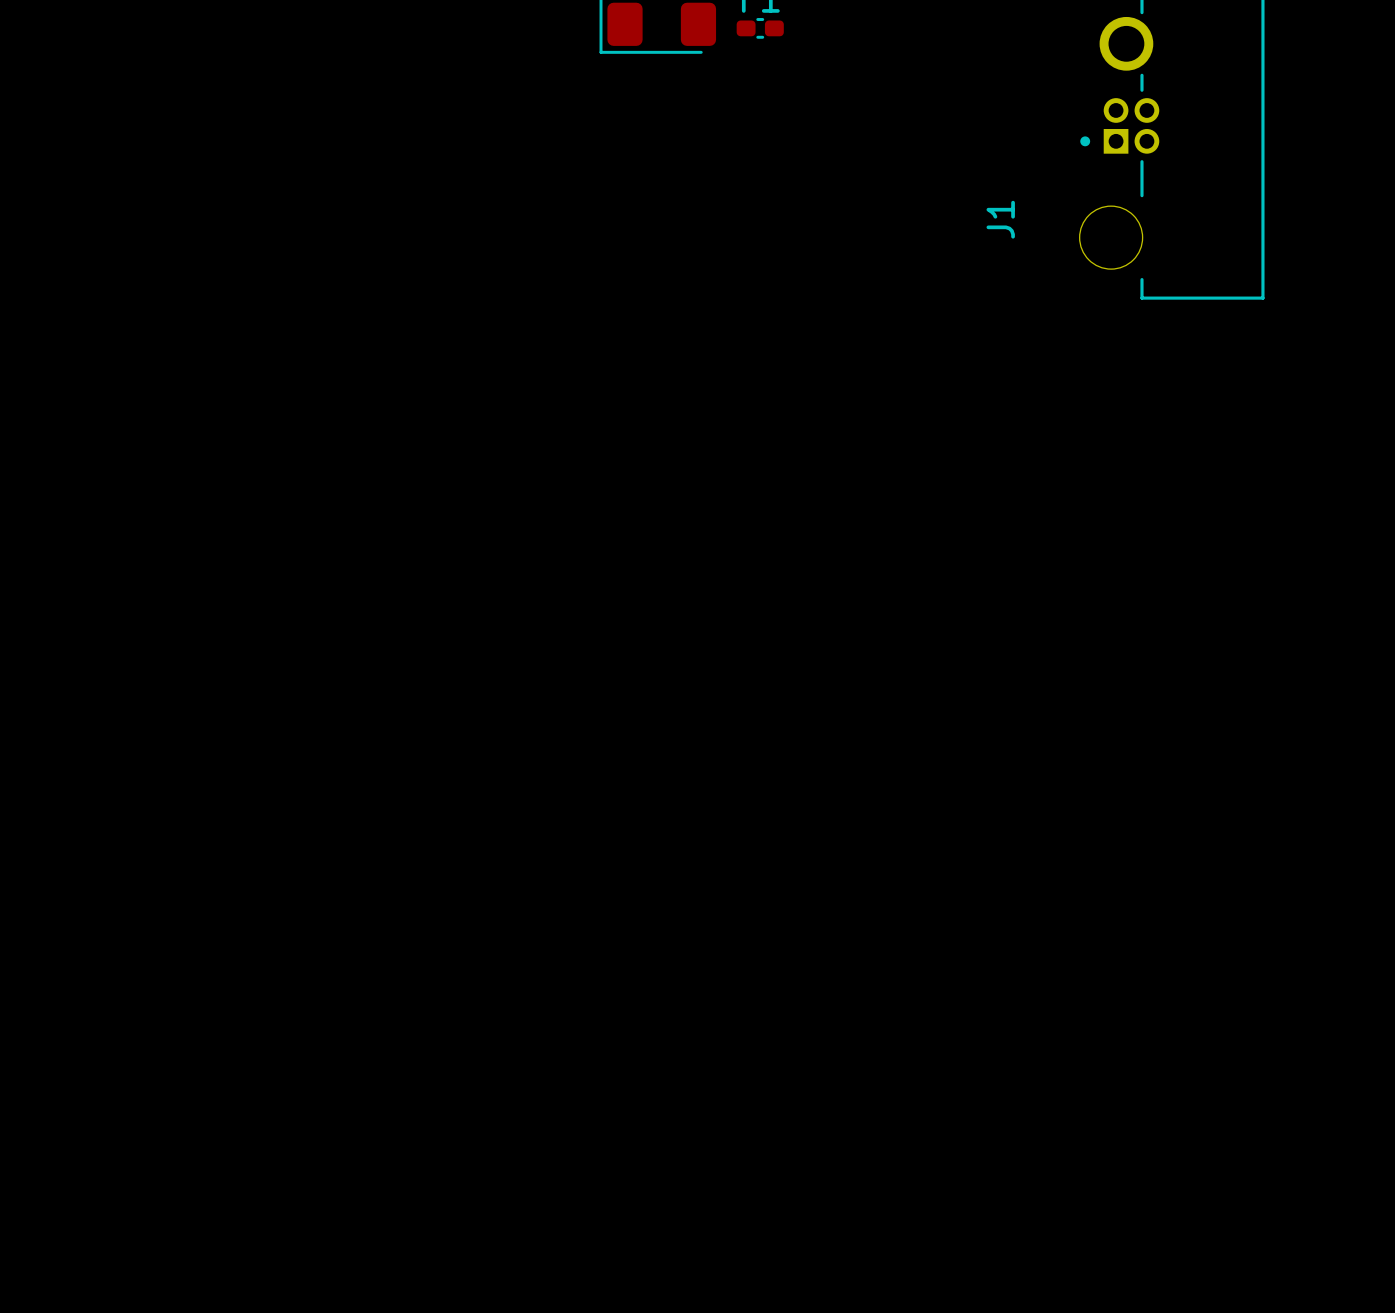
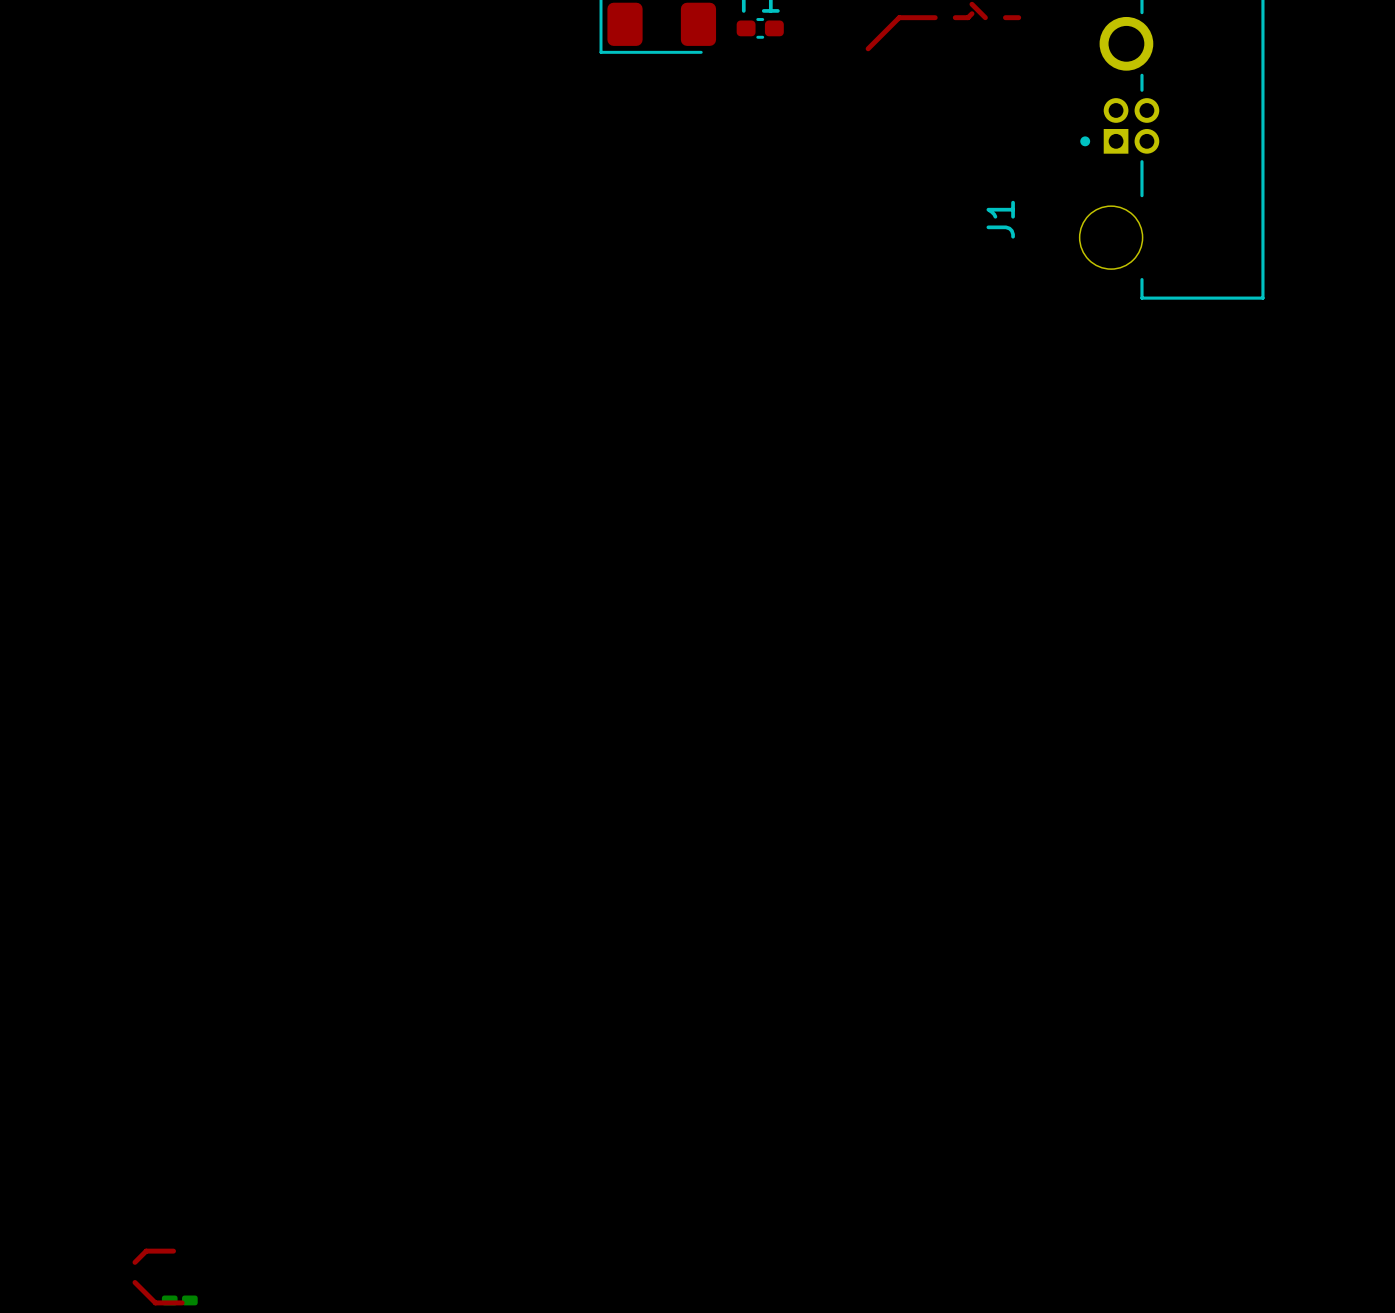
top track: none -> (971, 4) (985, 17)
top track: none -> (971, 13) (968, 17) (955, 17)
top track: none -> (935, 17) (899, 17) (868, 48)
top track: none -> (1005, 17) (1018, 17)
top track: none -> (173, 1251) (146, 1251) (134, 1262)
top track: none -> (134, 1282) (155, 1302) (182, 1302)
part: none -> (179, 1300)

